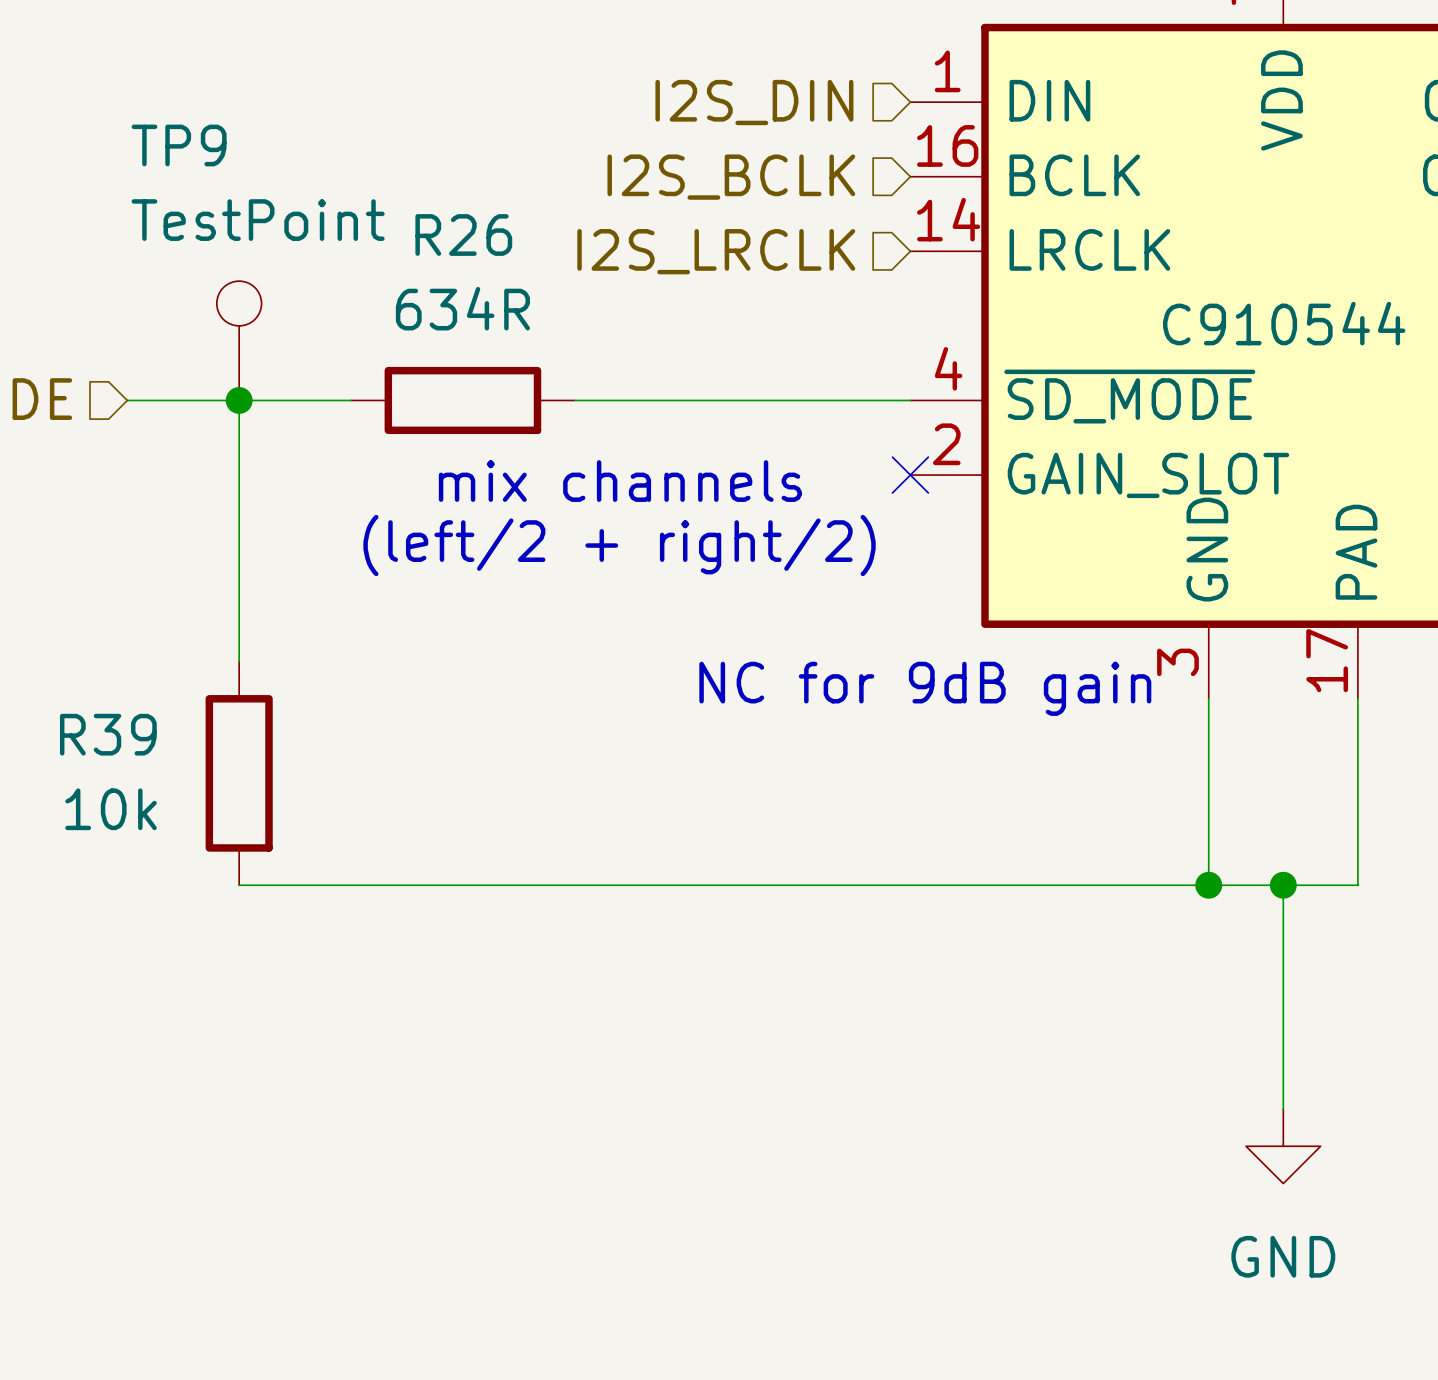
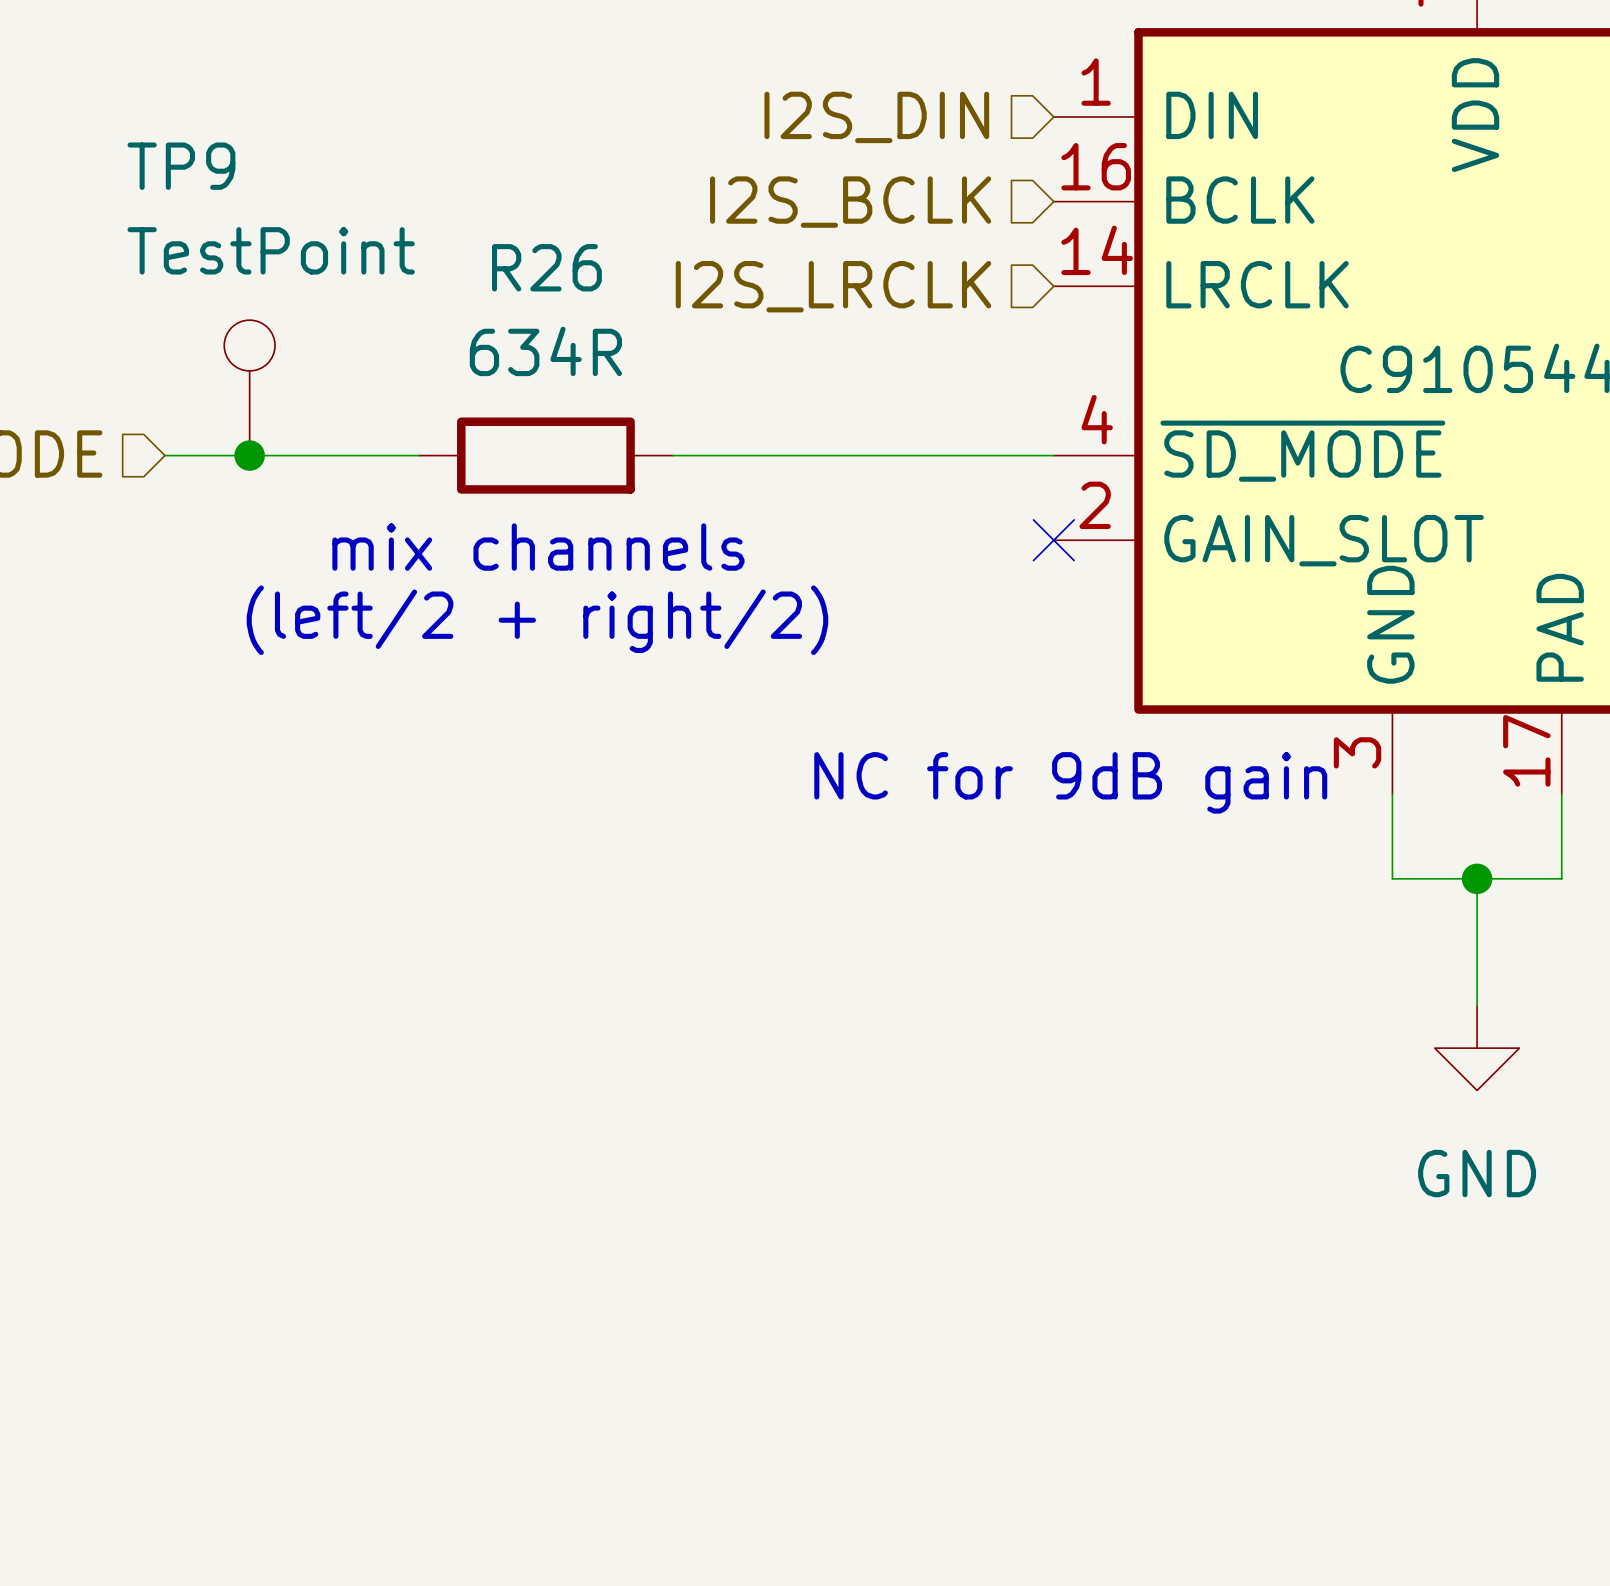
TP9 position: (239, 340) -> (249, 387)
wire: (239, 400) (239, 661) -> none
junction position: (239, 400) -> (249, 455)
text position: mix channels (620, 481) -> mix channels (538, 547)
text position: (left/2 + right/2) (619, 545) -> (left/2 + right/2) (537, 620)
R39: 10k (239, 773) -> none
wire: (1208, 773) (1208, 885) -> (1392, 878) (1561, 878)
junction: none -> (1477, 878)
wire: (1357, 773) (1357, 885) (239, 885) -> none
junction: (1208, 885) -> none
wire: (1283, 885) (1283, 1109) -> (1477, 1005) (1477, 878)
junction: (1283, 885) -> none
power symbol position: GND (1283, 1146) -> GND (1477, 1048)

